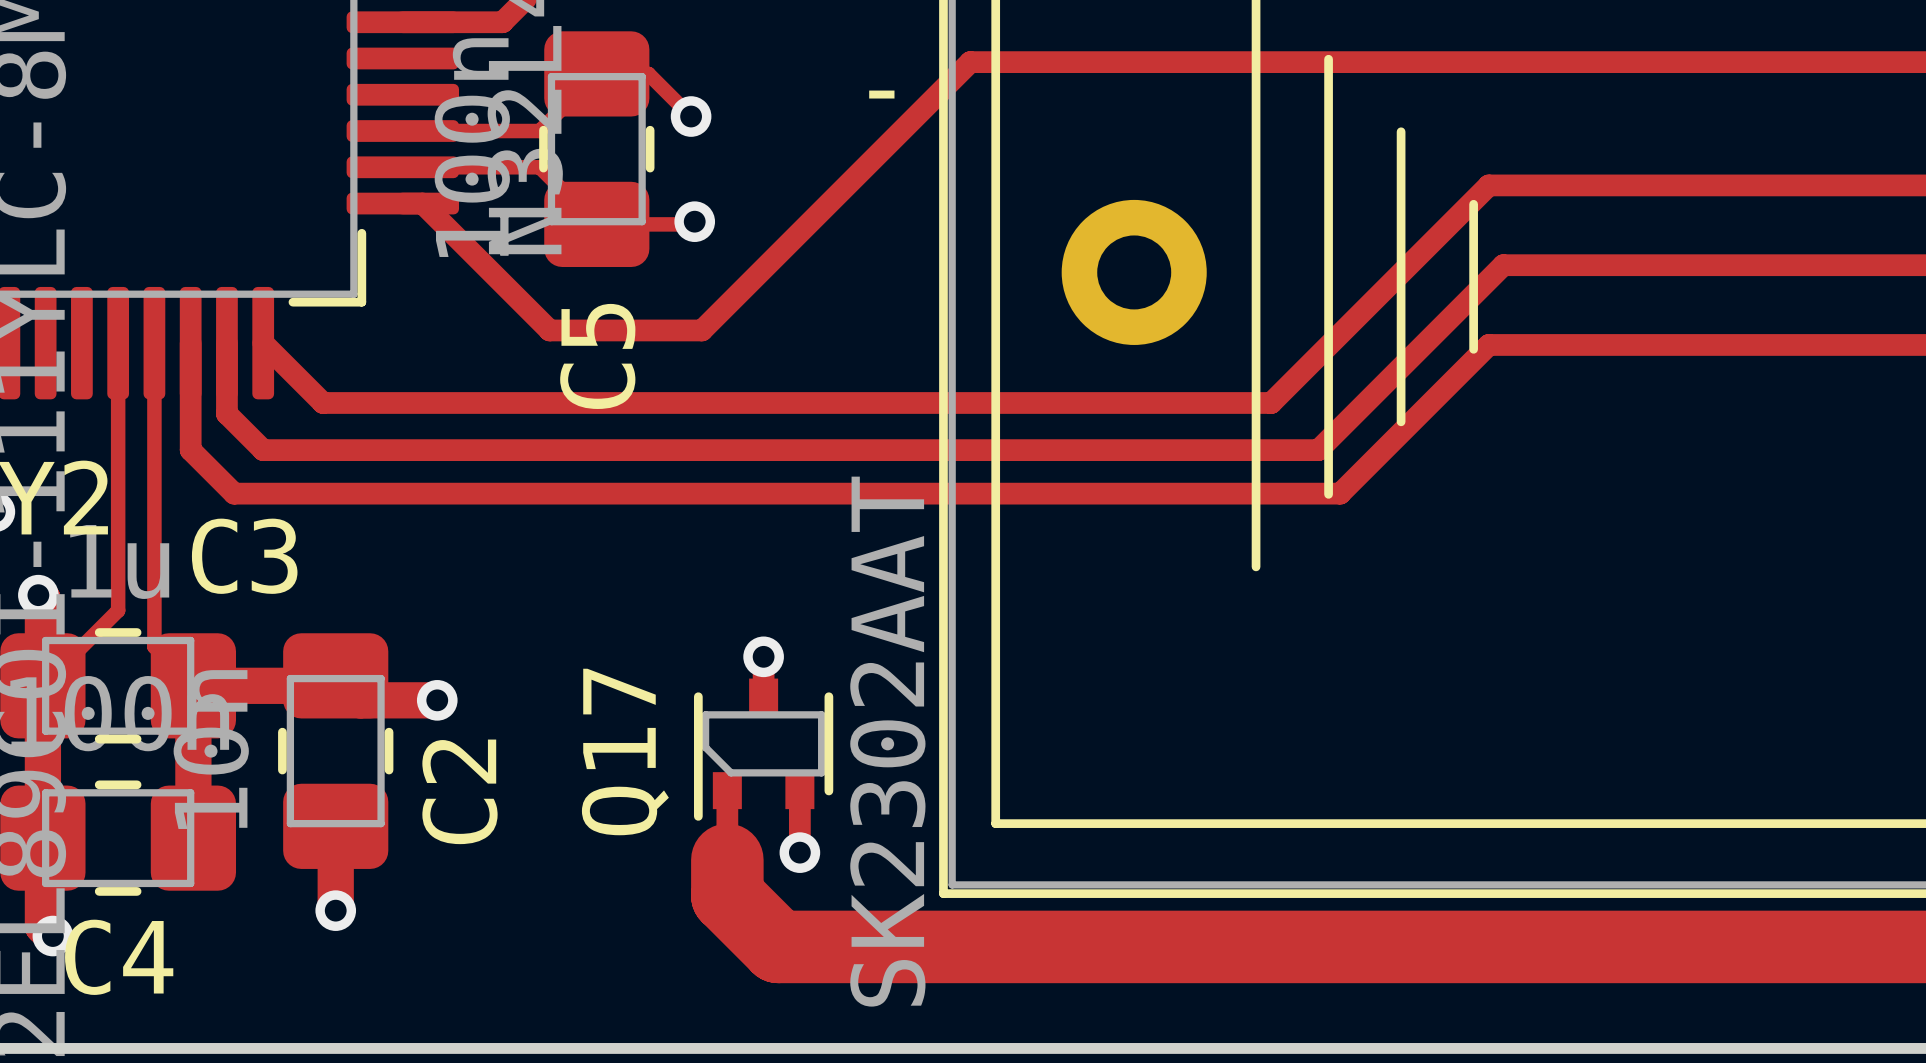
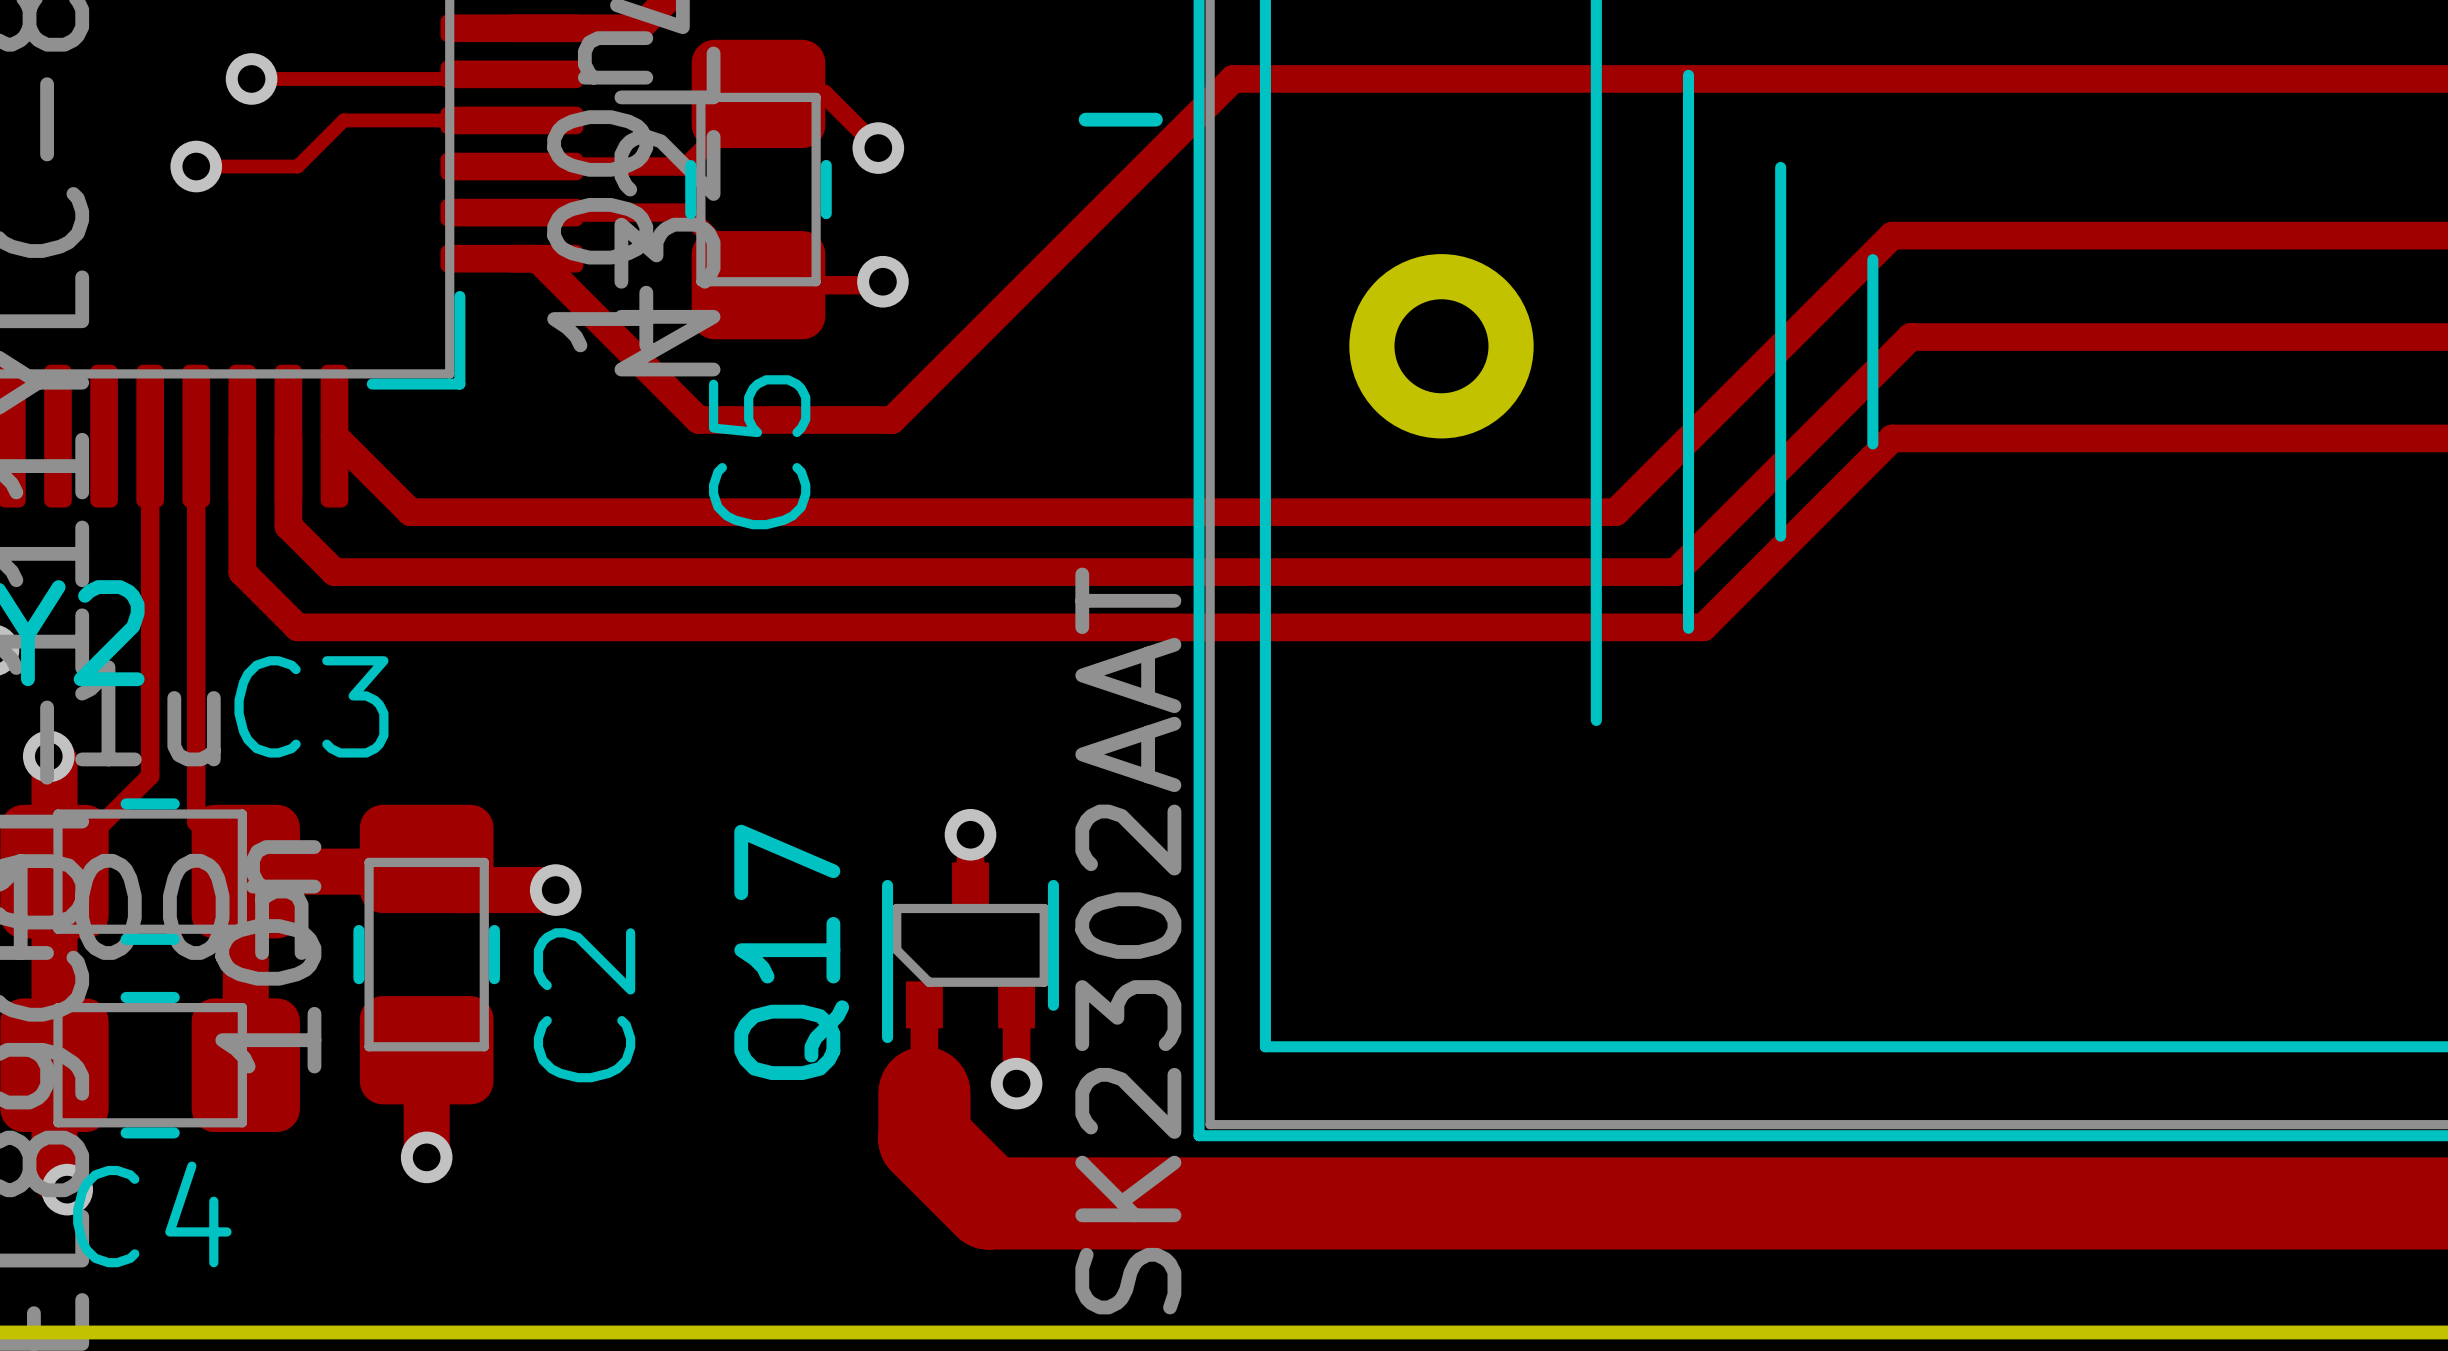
track: none -> (251, 78) (507, 78)
via: none -> (251, 78)
track: none -> (511, 120) (343, 120) (297, 166) (196, 166)
via: none -> (196, 166)

